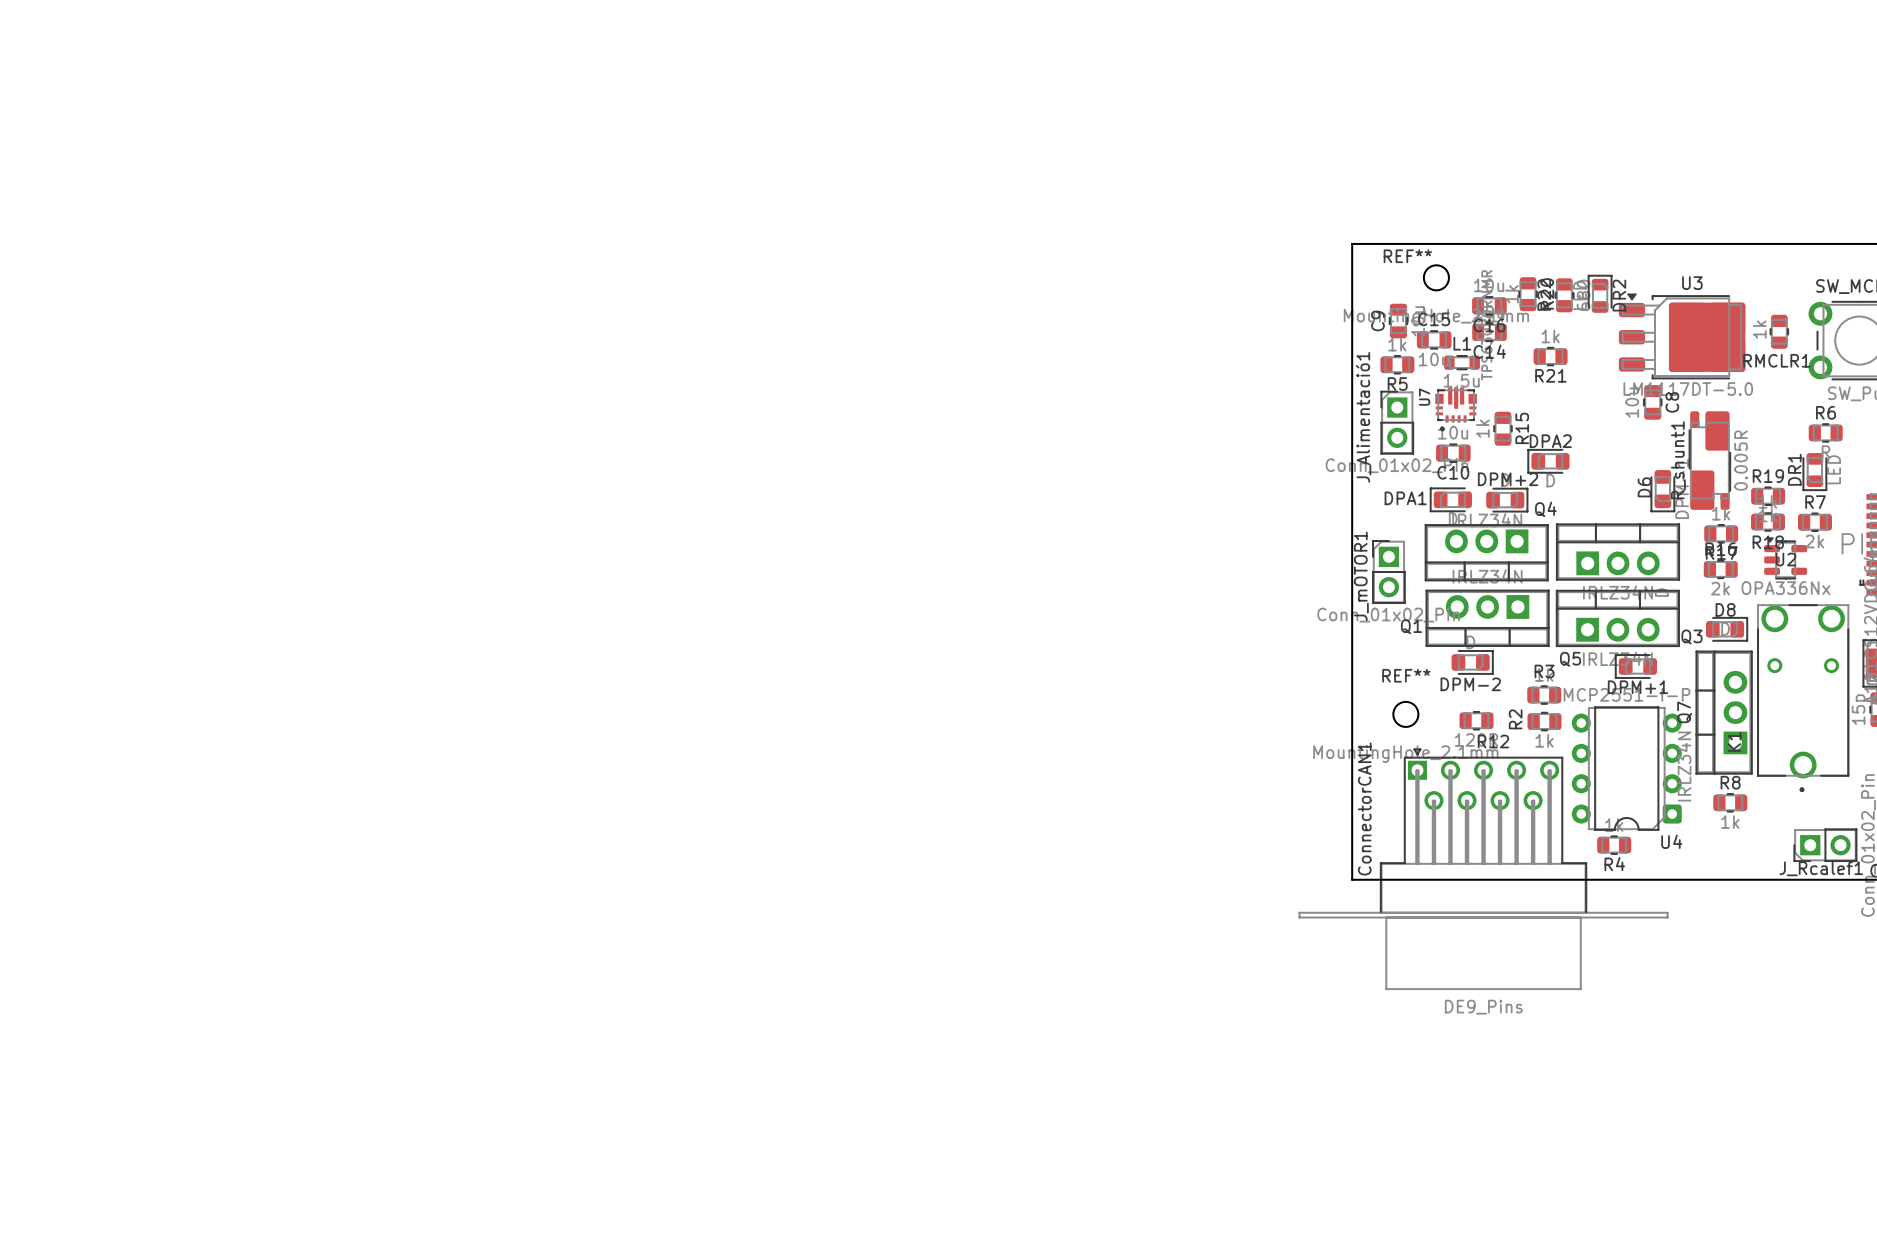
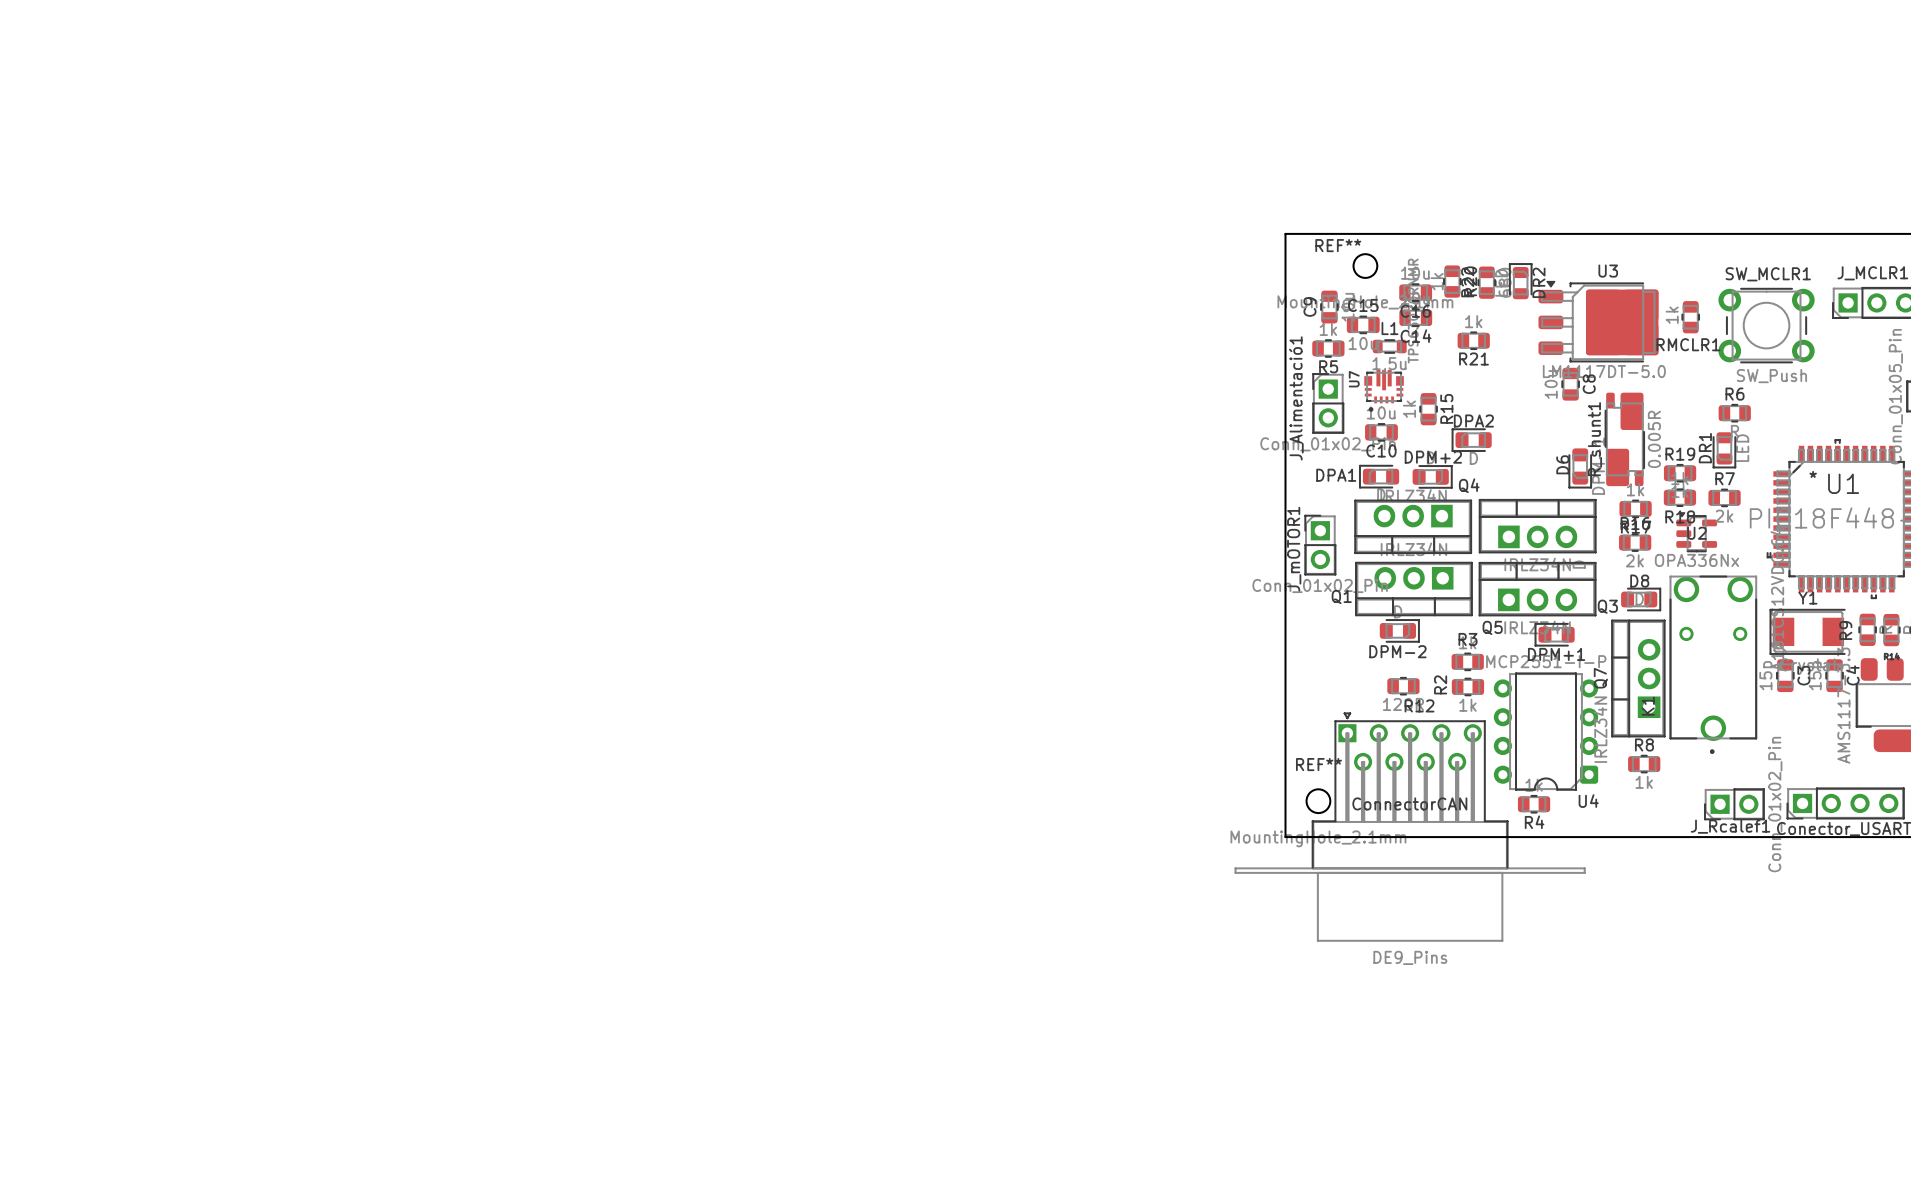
REF** position: (1405, 714) -> (1318, 801)
ConnectorCAN1 name: ConnectorCAN1 (1364, 809) -> ConnectorCAN (1409, 803)

